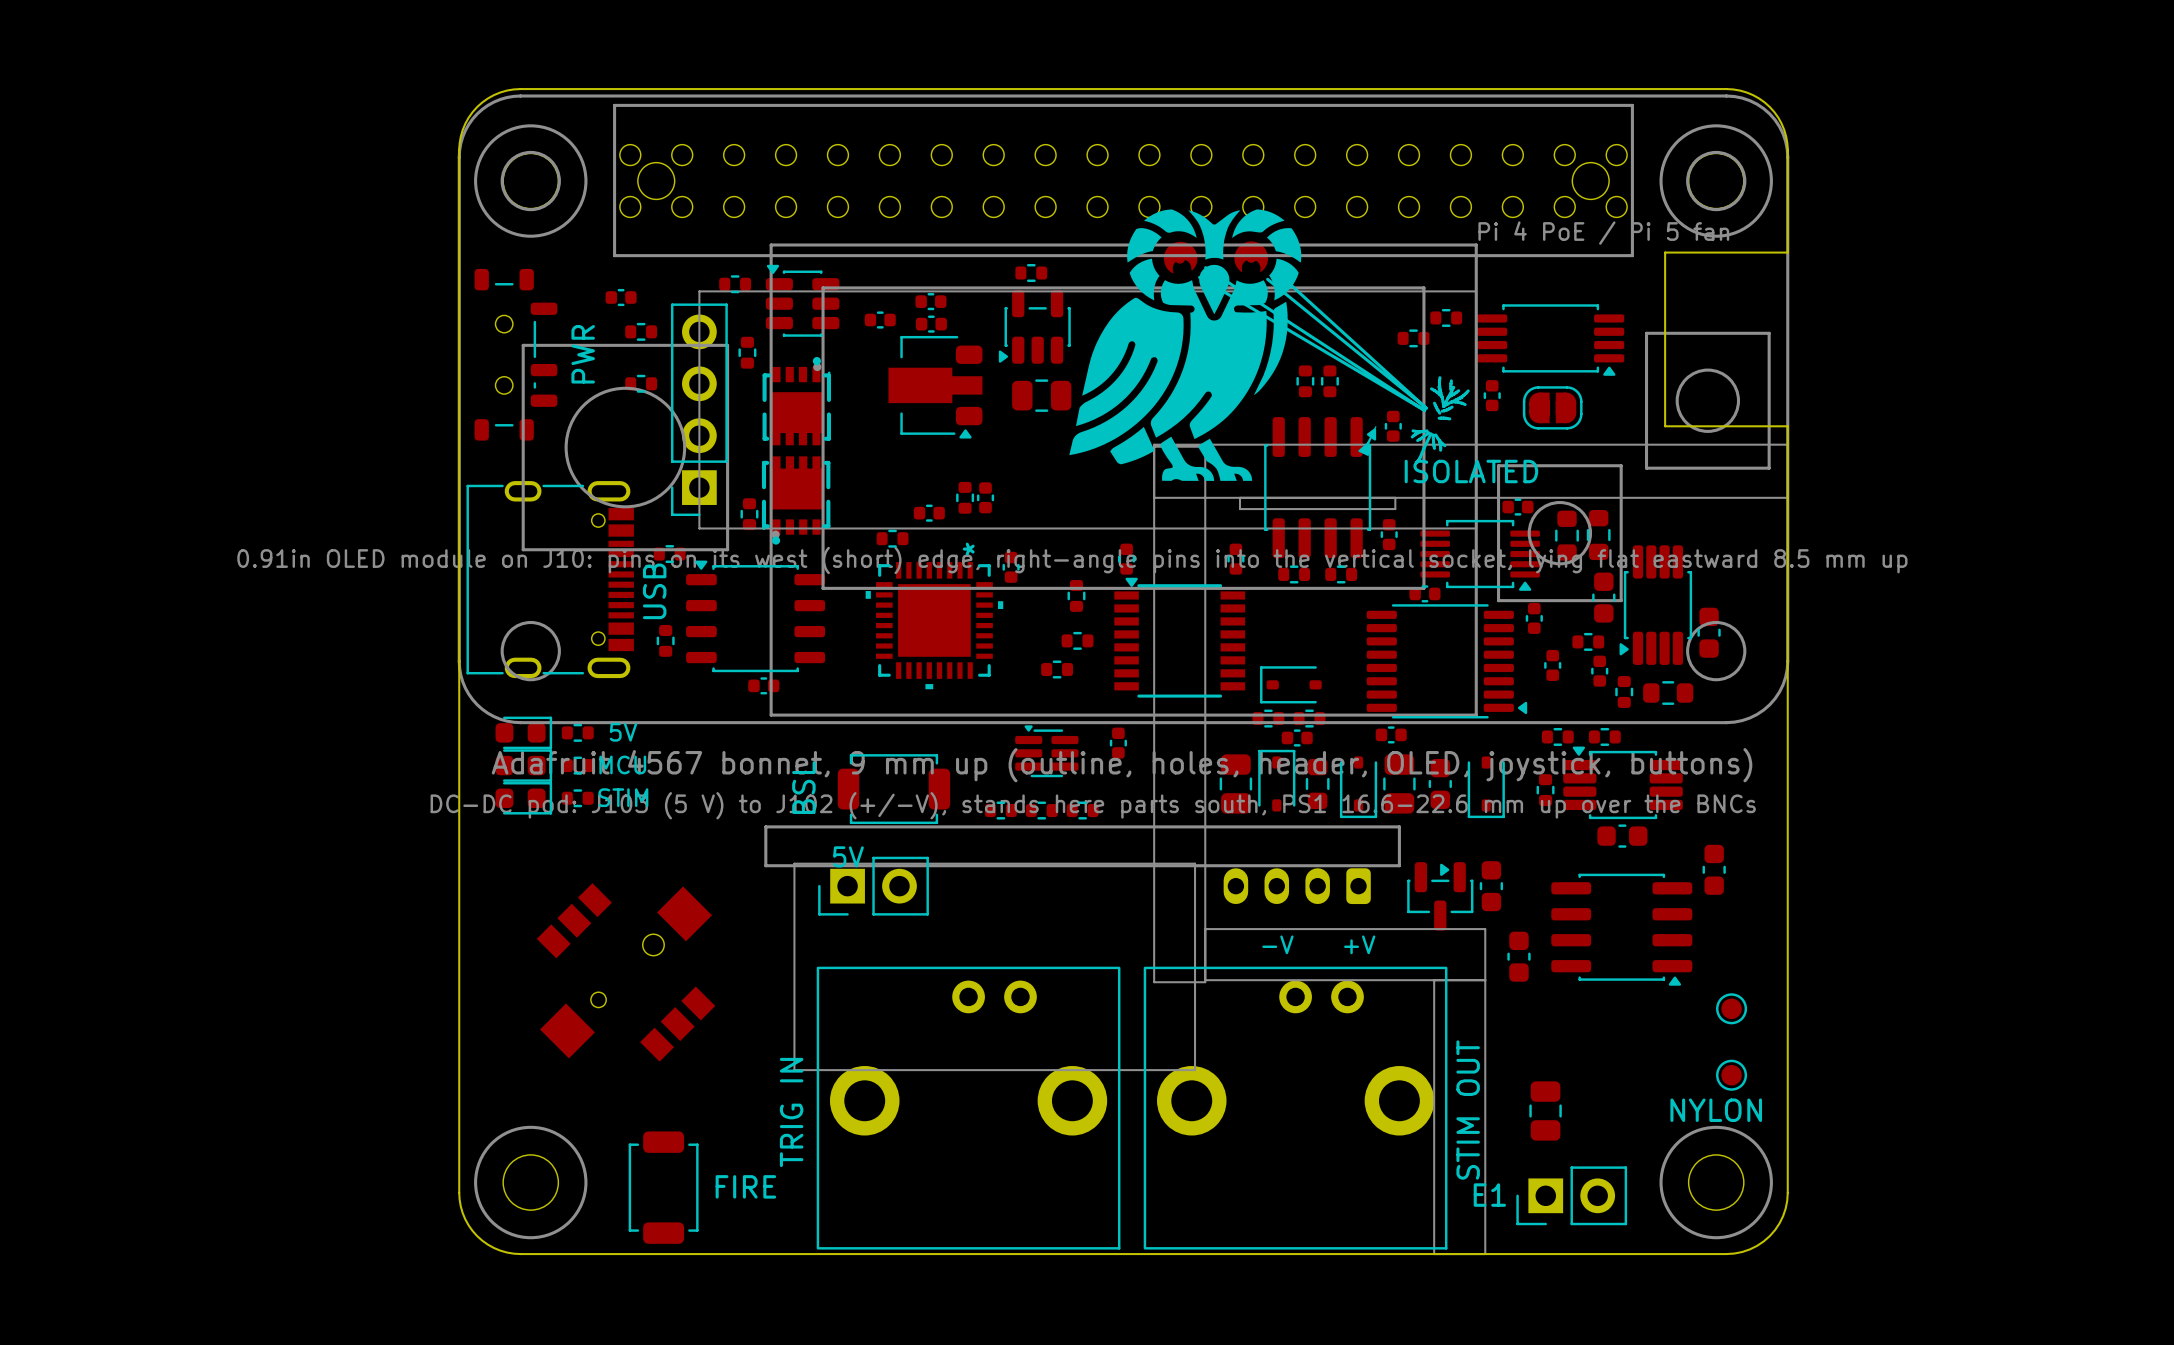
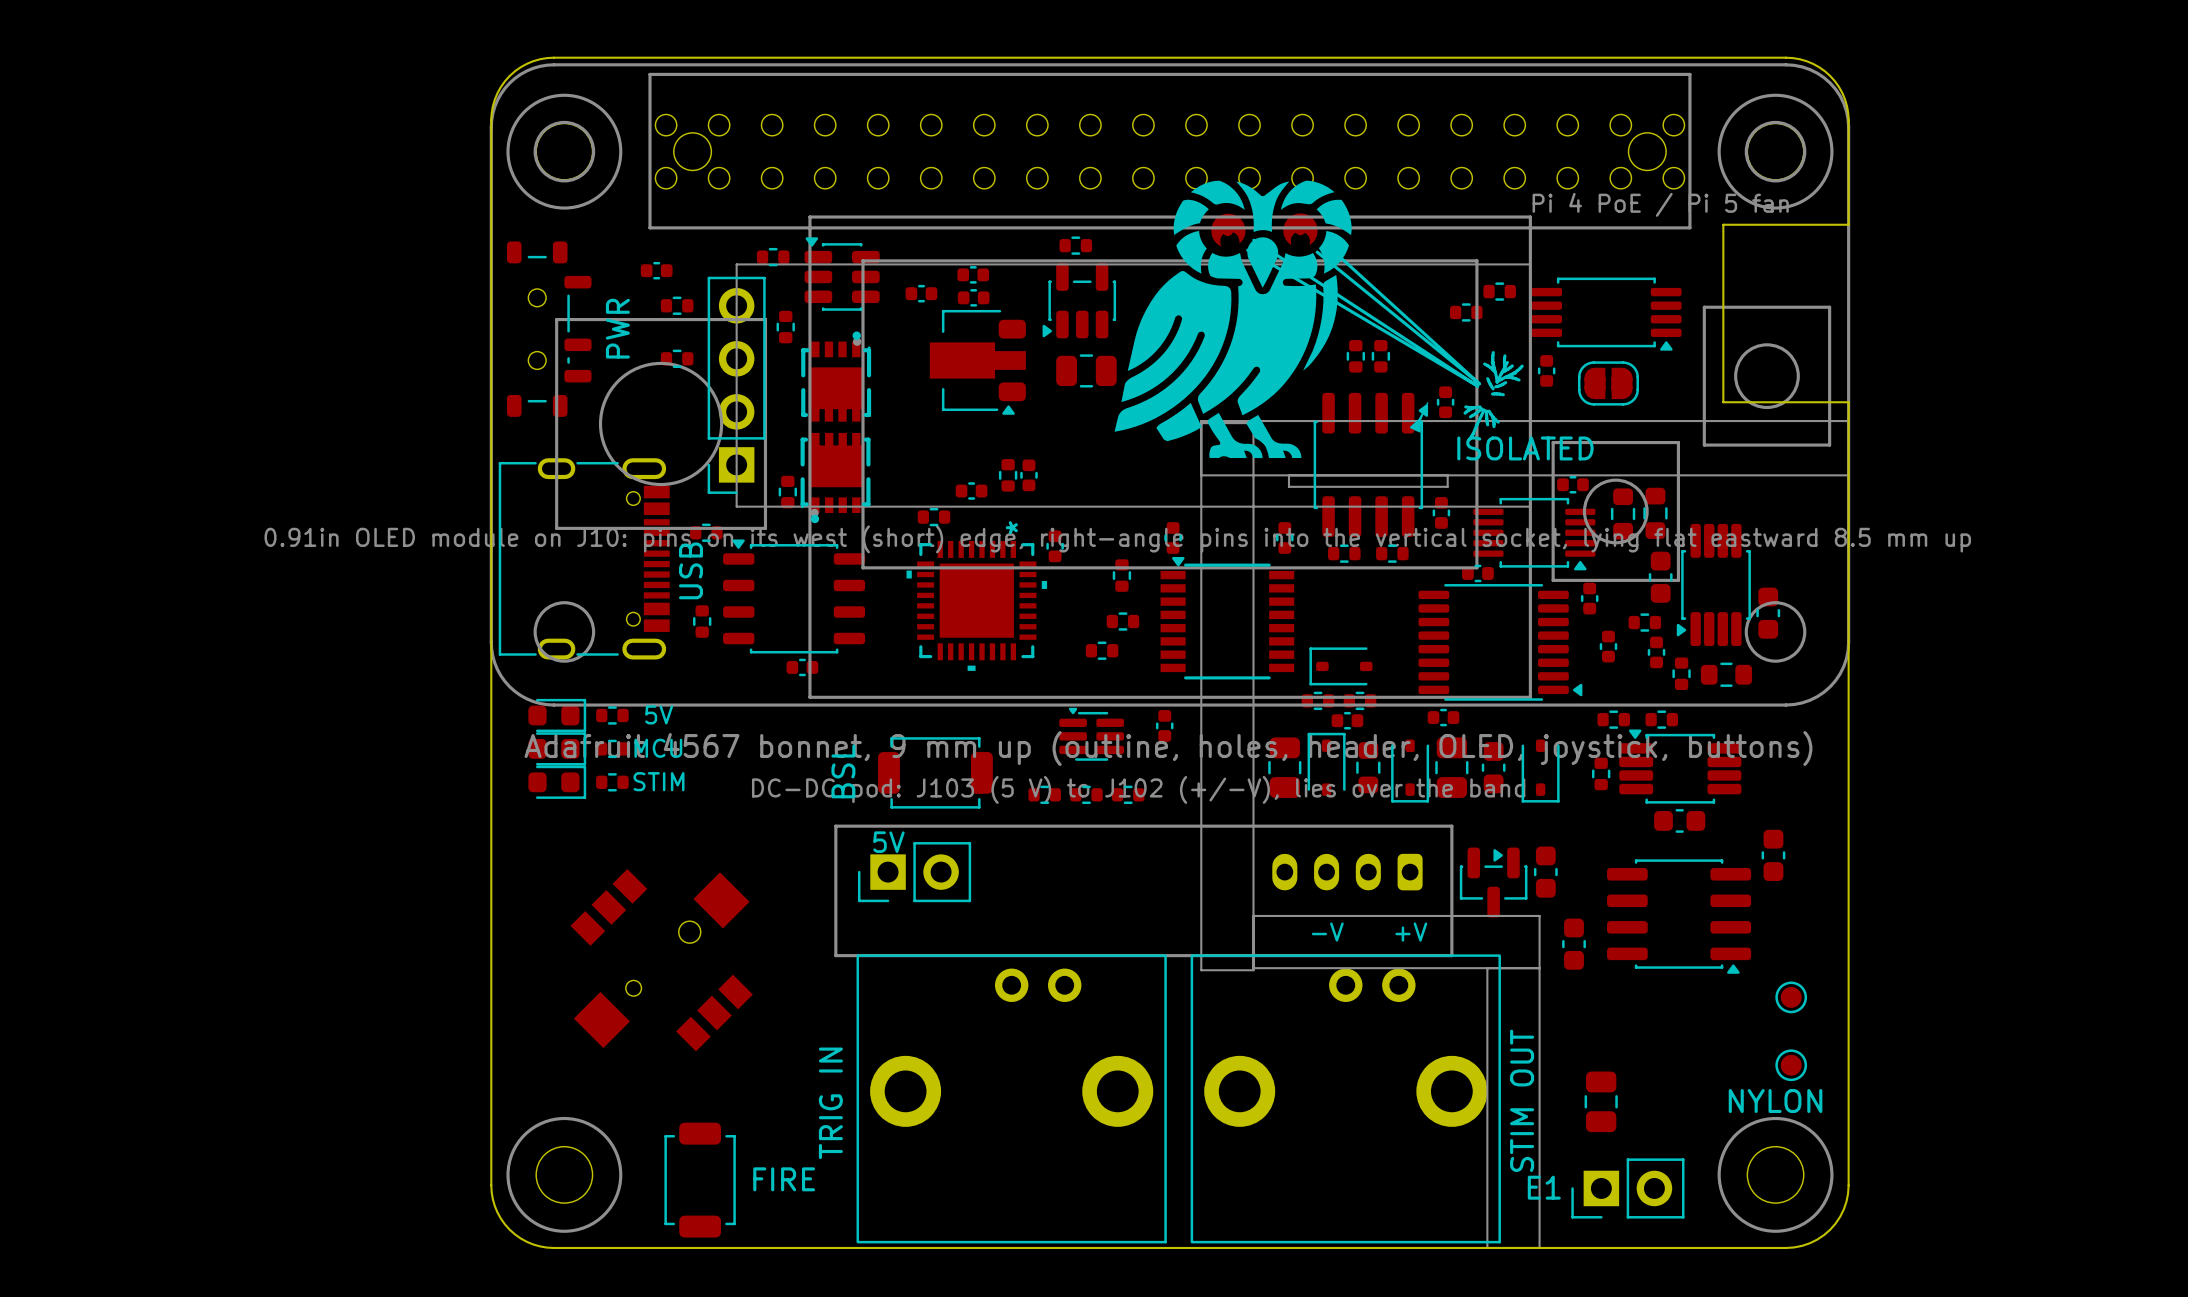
text: DC-DC pod: J103 (5 V) to J102 (+/-V), stands here parts south, PS1 16.6-22.6 mm up over the BNCs (1093, 805) -> DC-DC pod: J103 (5 V) to J102 (+/-V), lies over the band (1138, 789)
line: (1399, 841) (1399, 826) (765, 826) (765, 865) (1399, 865) -> (1451, 826) (835, 826) (835, 955) (1451, 955) (1451, 851)
line: (794, 863) (1195, 863) (1195, 1070) (794, 1070) (794, 863) -> none

